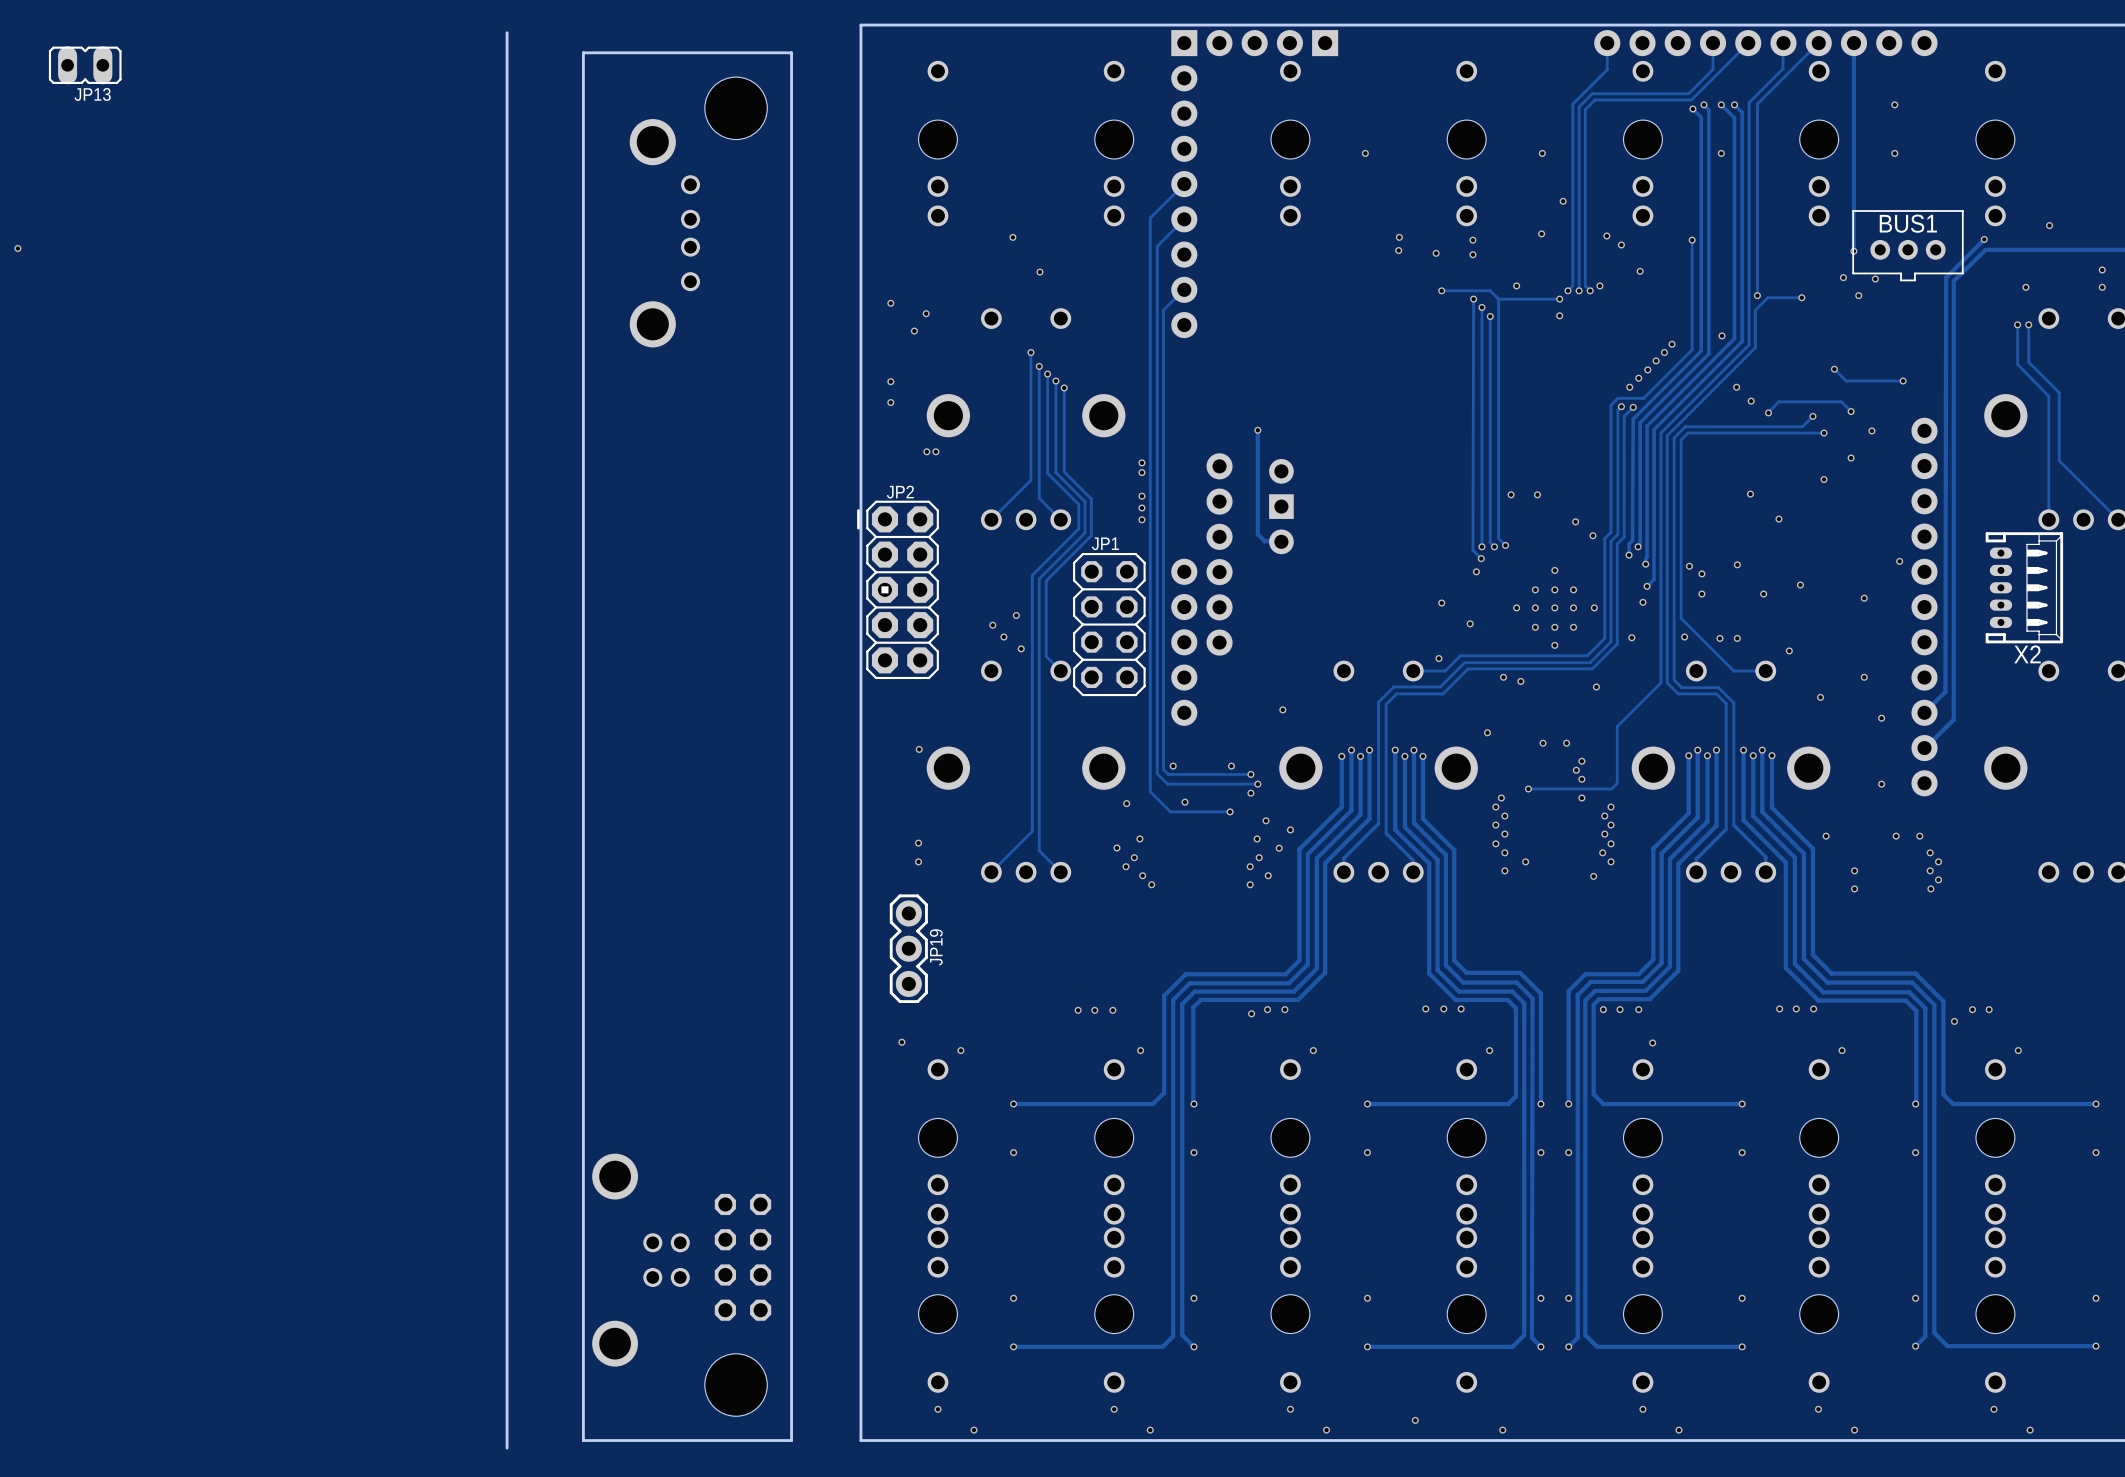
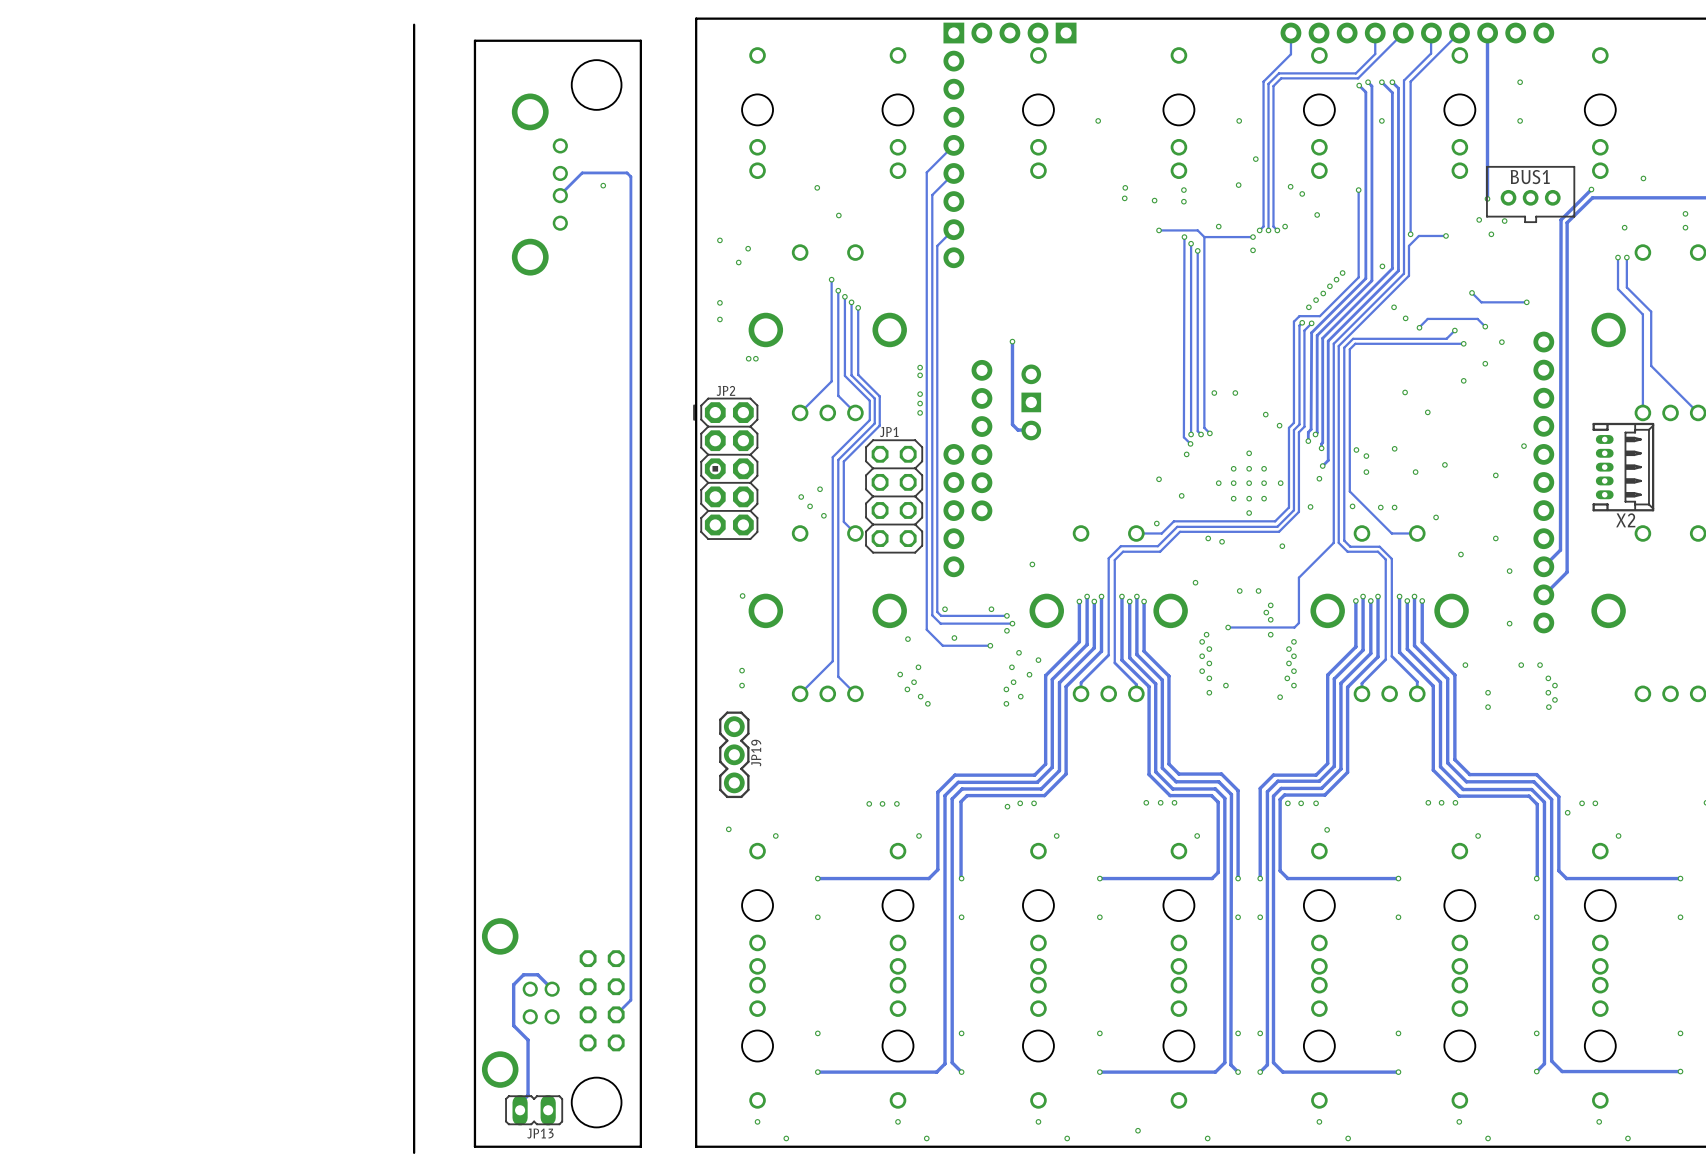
JP13 position: (85, 65) -> (534, 1110)
via: none -> (603, 185)
track: none -> (560, 195) (582, 172) (627, 172) (630, 176) (630, 1000) (616, 1014)
via: (17, 248) -> none
track: none -> (552, 989) (537, 974) (523, 974) (513, 984) (513, 1025) (528, 1040) (528, 1095) (520, 1103) (520, 1110)

